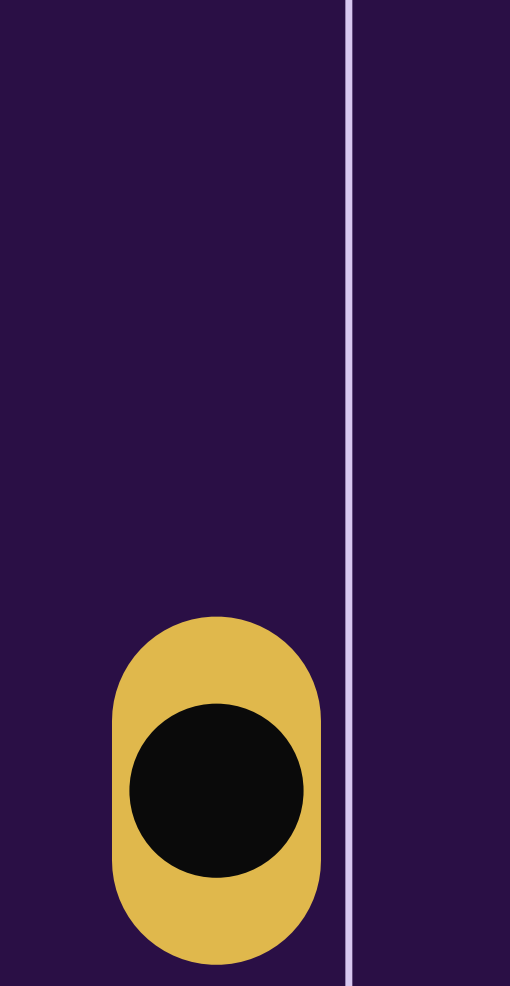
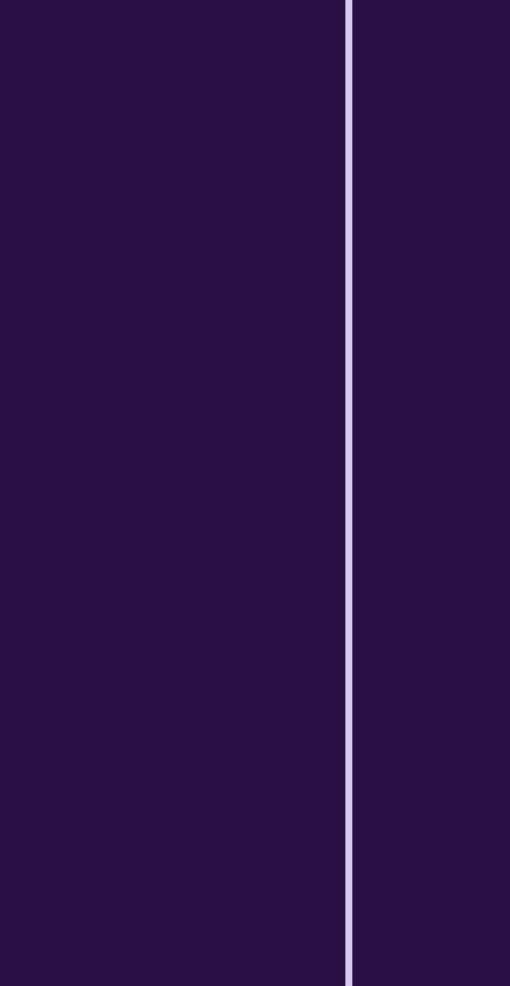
part: (216, 790) -> none

